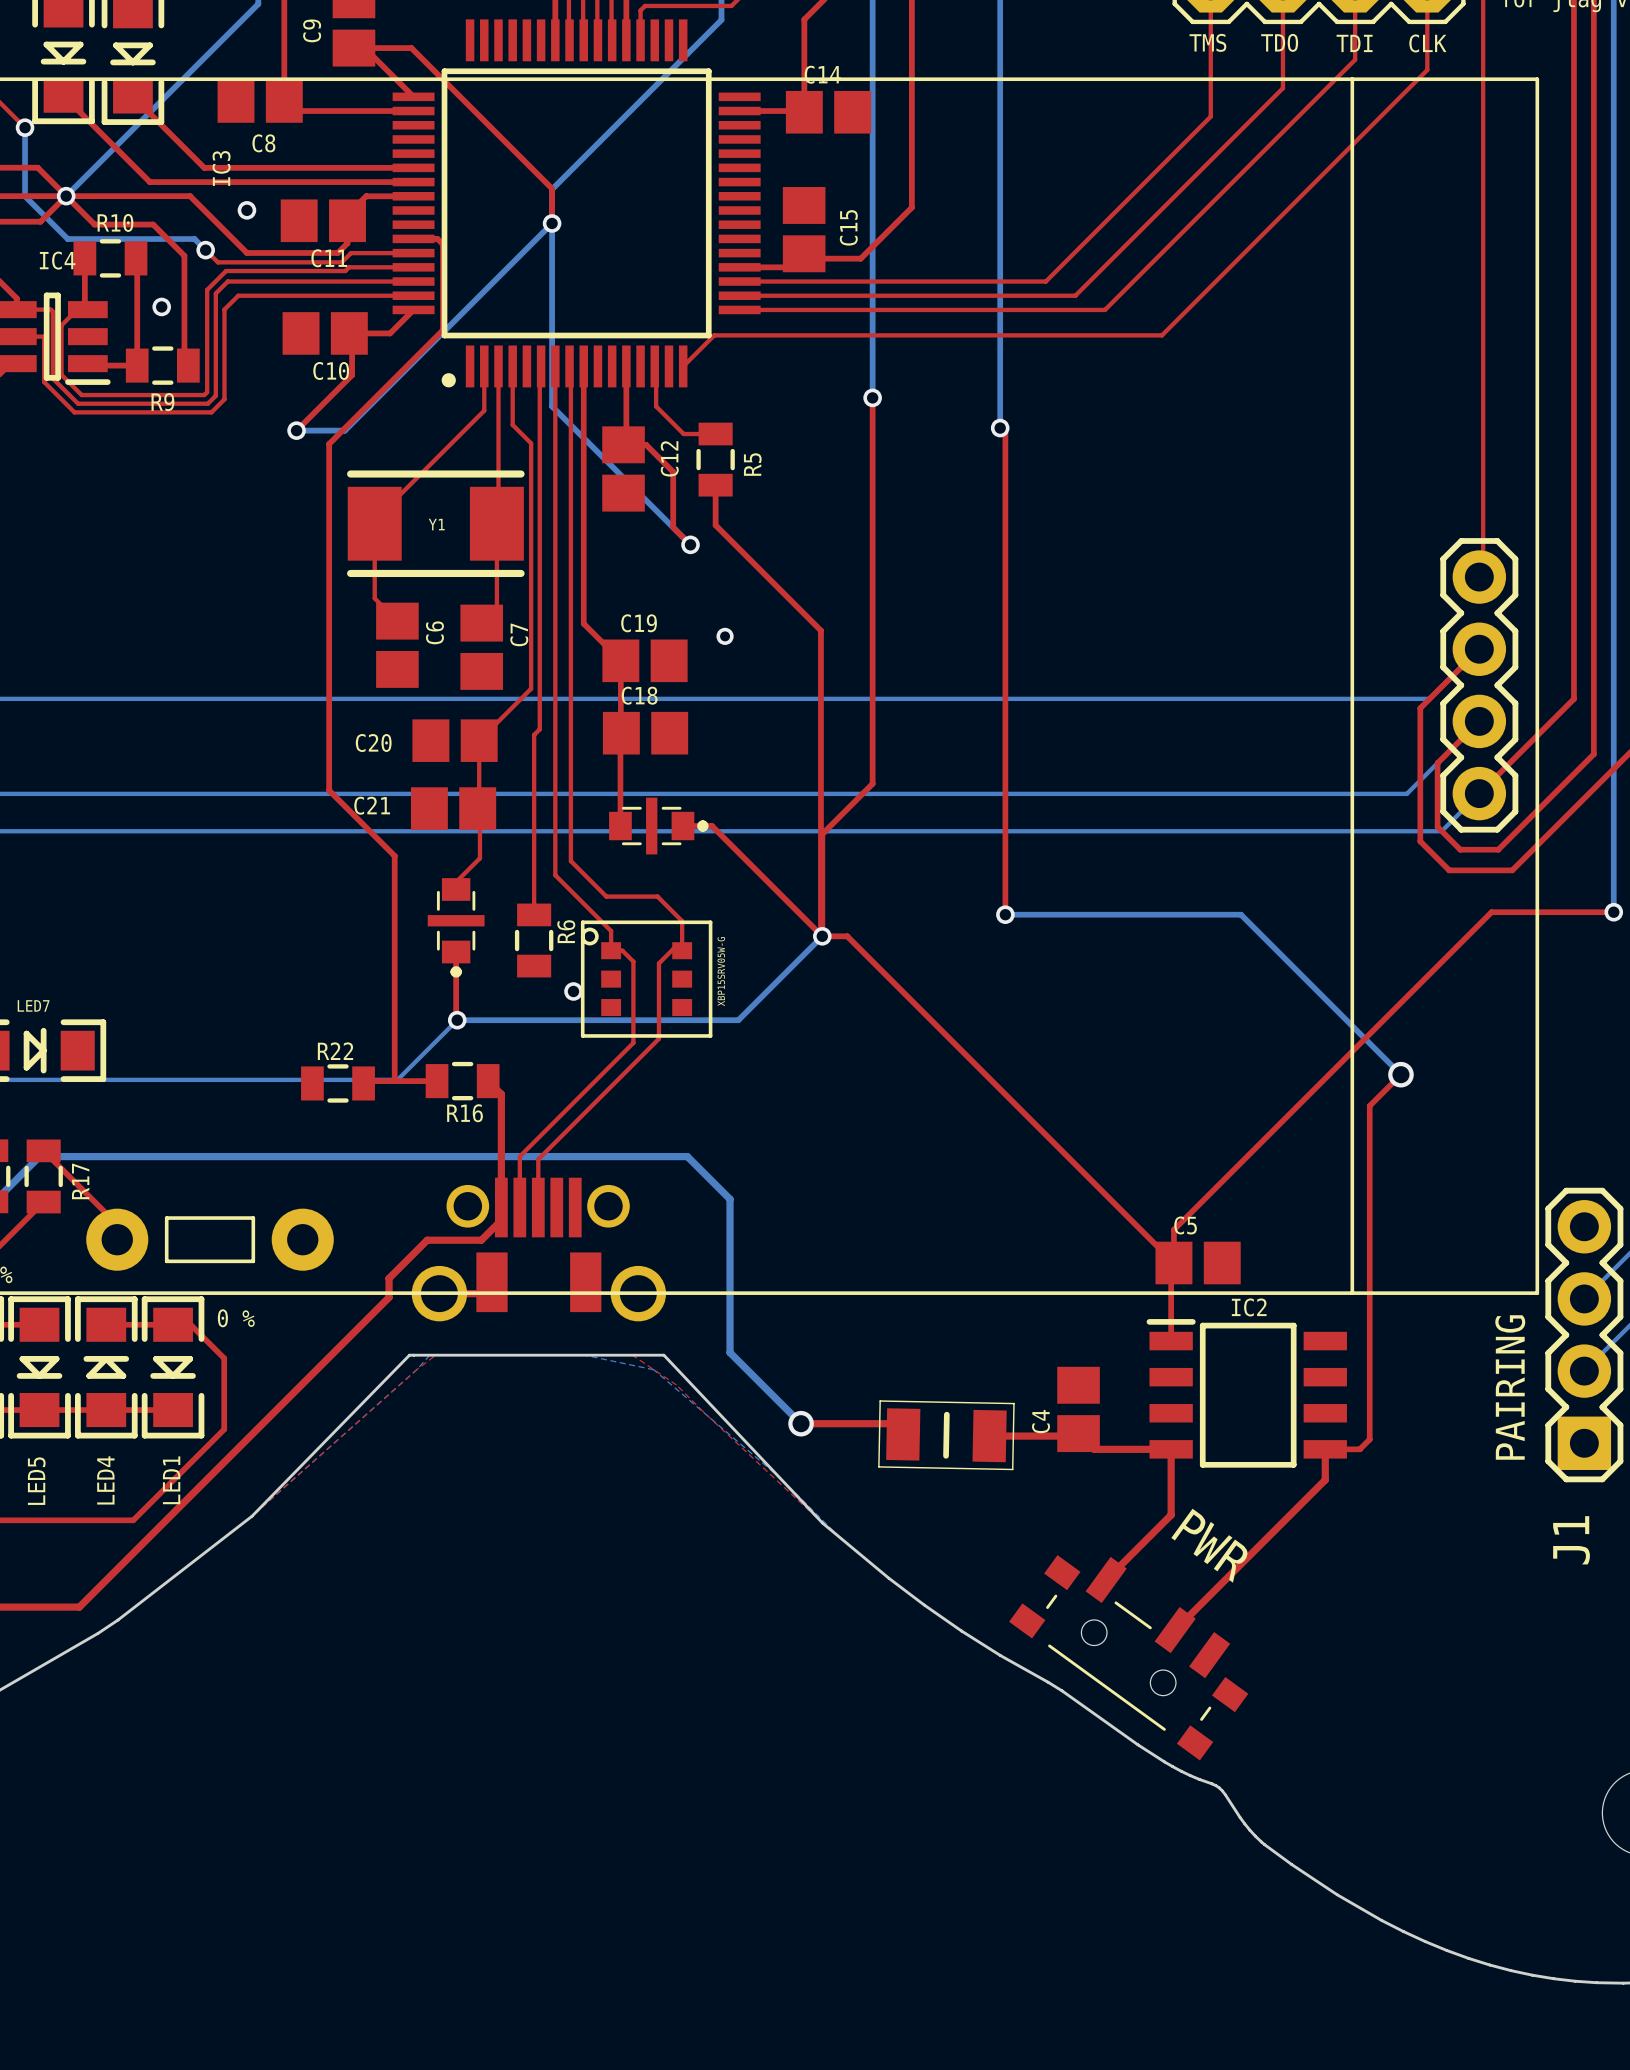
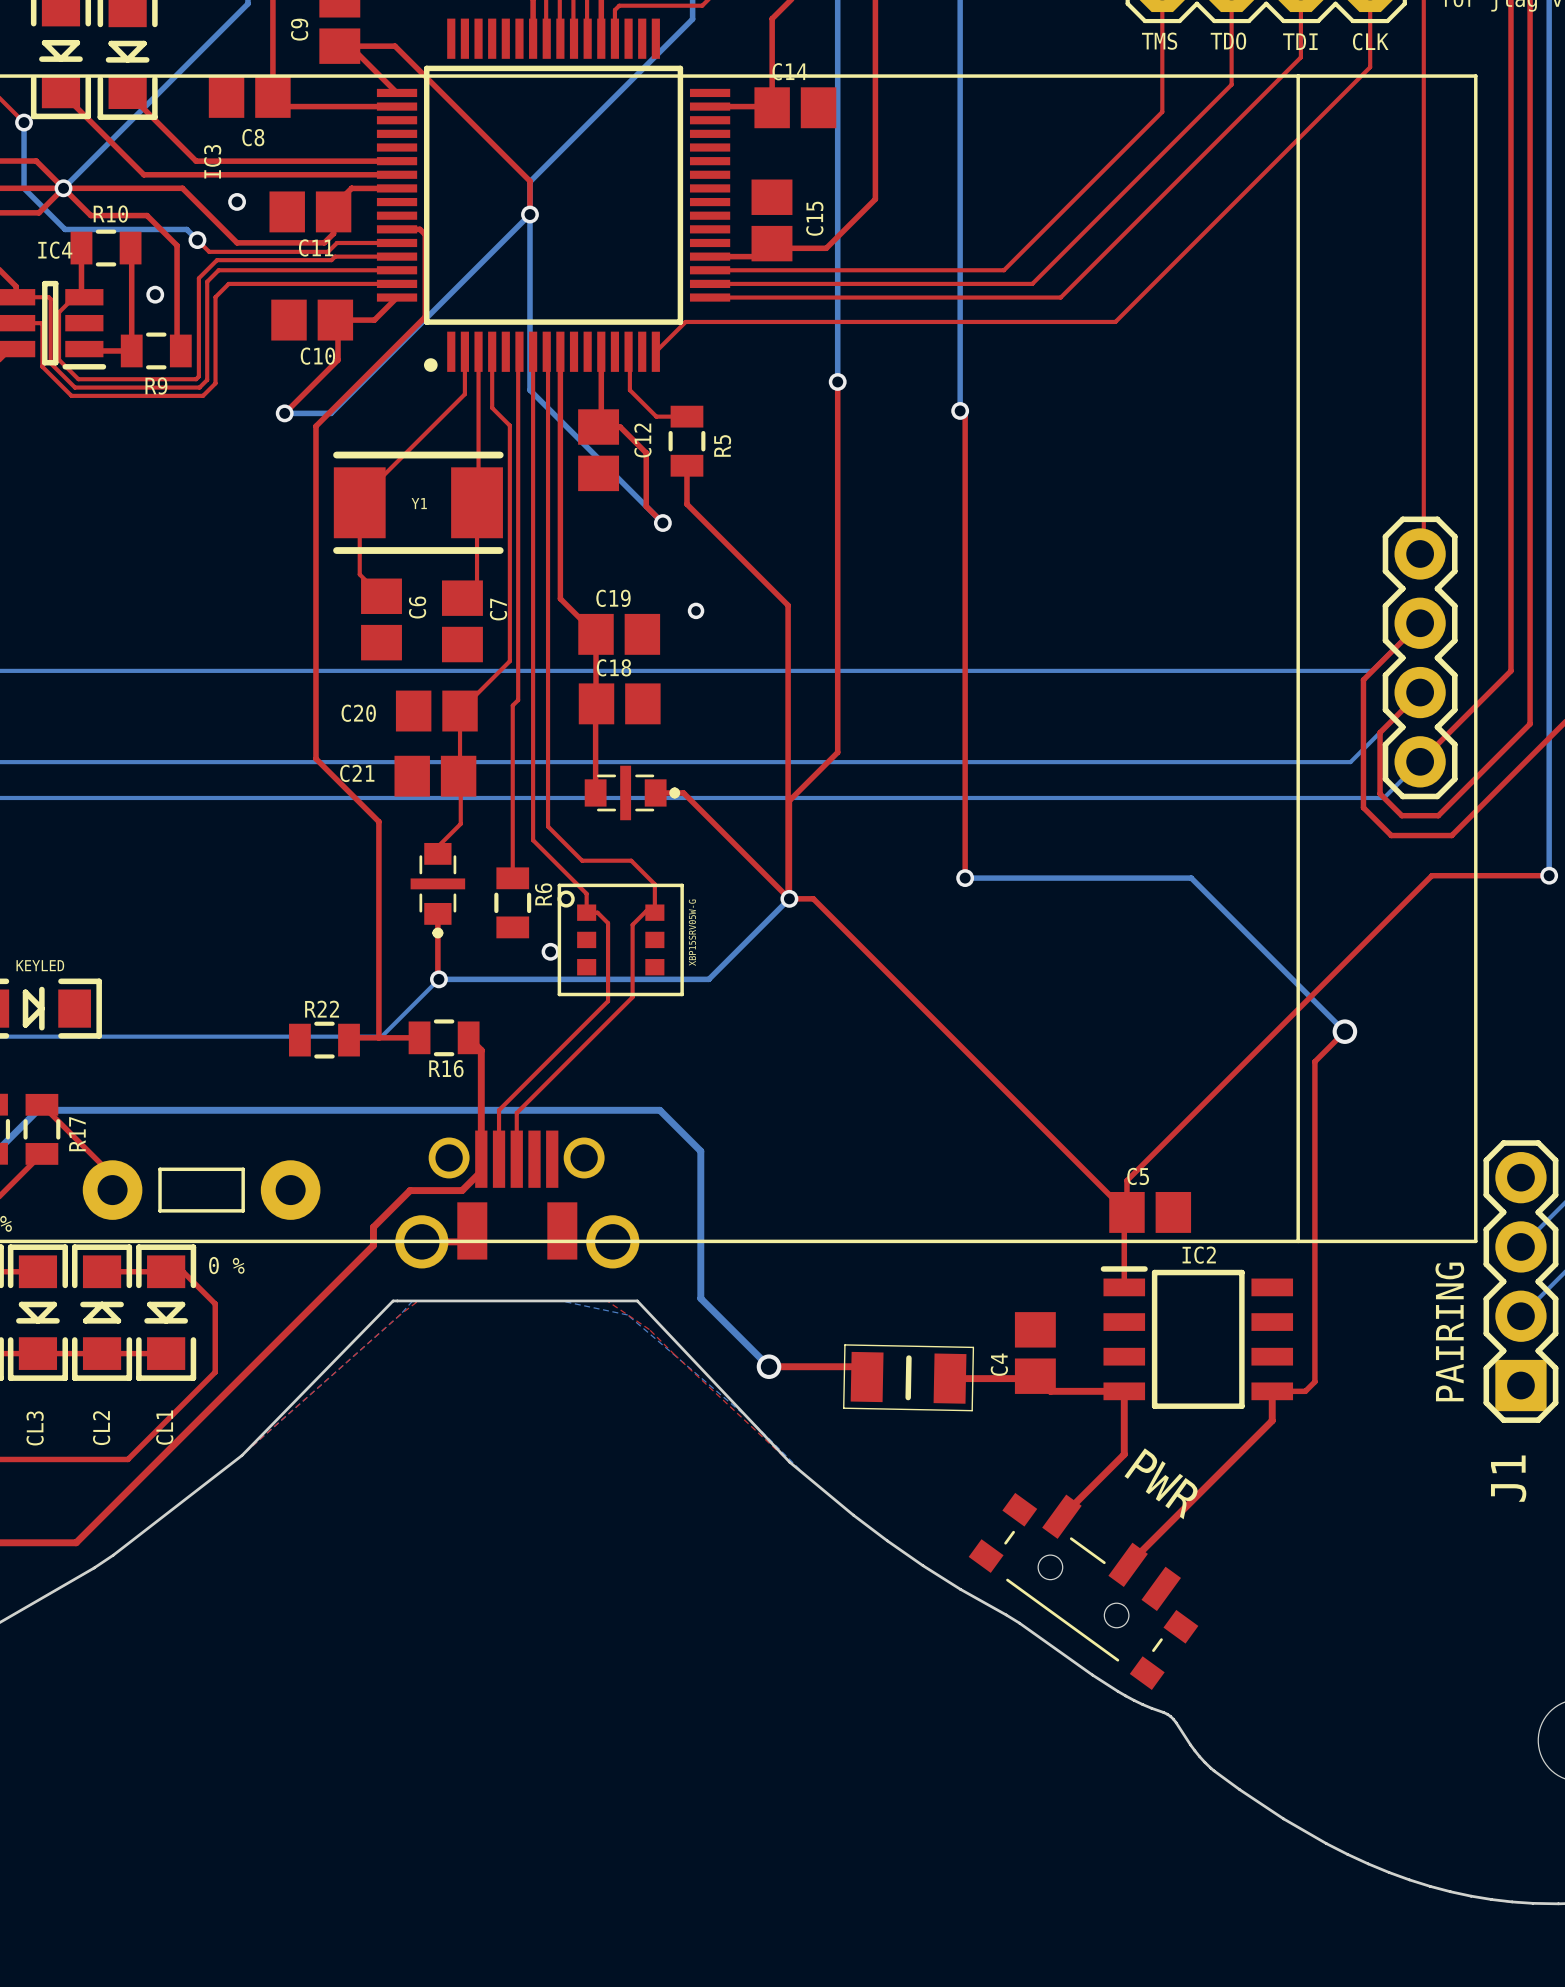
LED7 name: LED7 (33, 1005) -> KEYLED (40, 965)
LED4 name: LED4 (105, 1480) -> CL2 (101, 1428)
LED1 name: LED1 (171, 1480) -> CL1 (164, 1427)
LED5 name: LED5 (36, 1481) -> CL3 (35, 1428)

